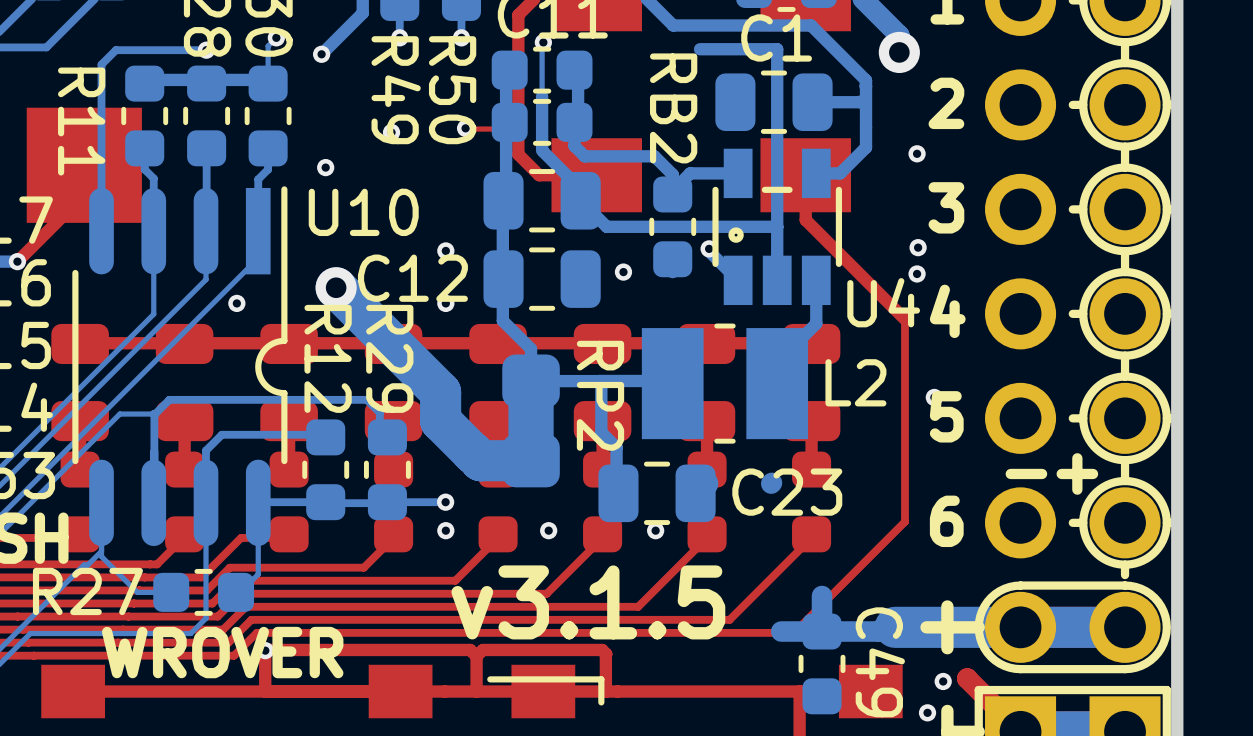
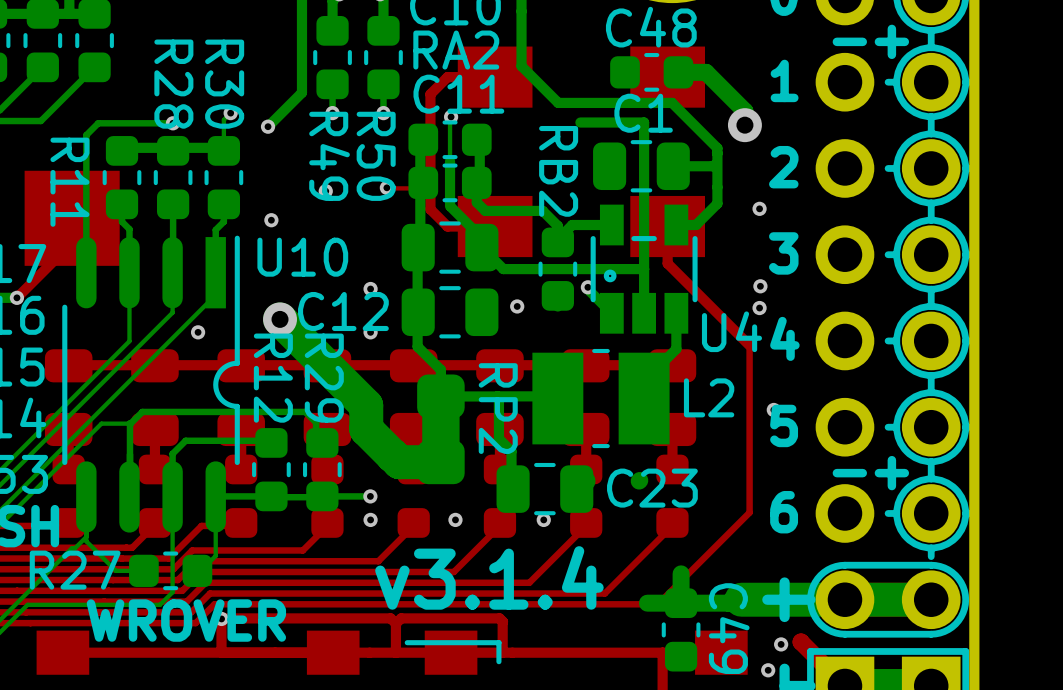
text: v3.1.5 (588, 602) -> v3.1.4 (489, 577)

